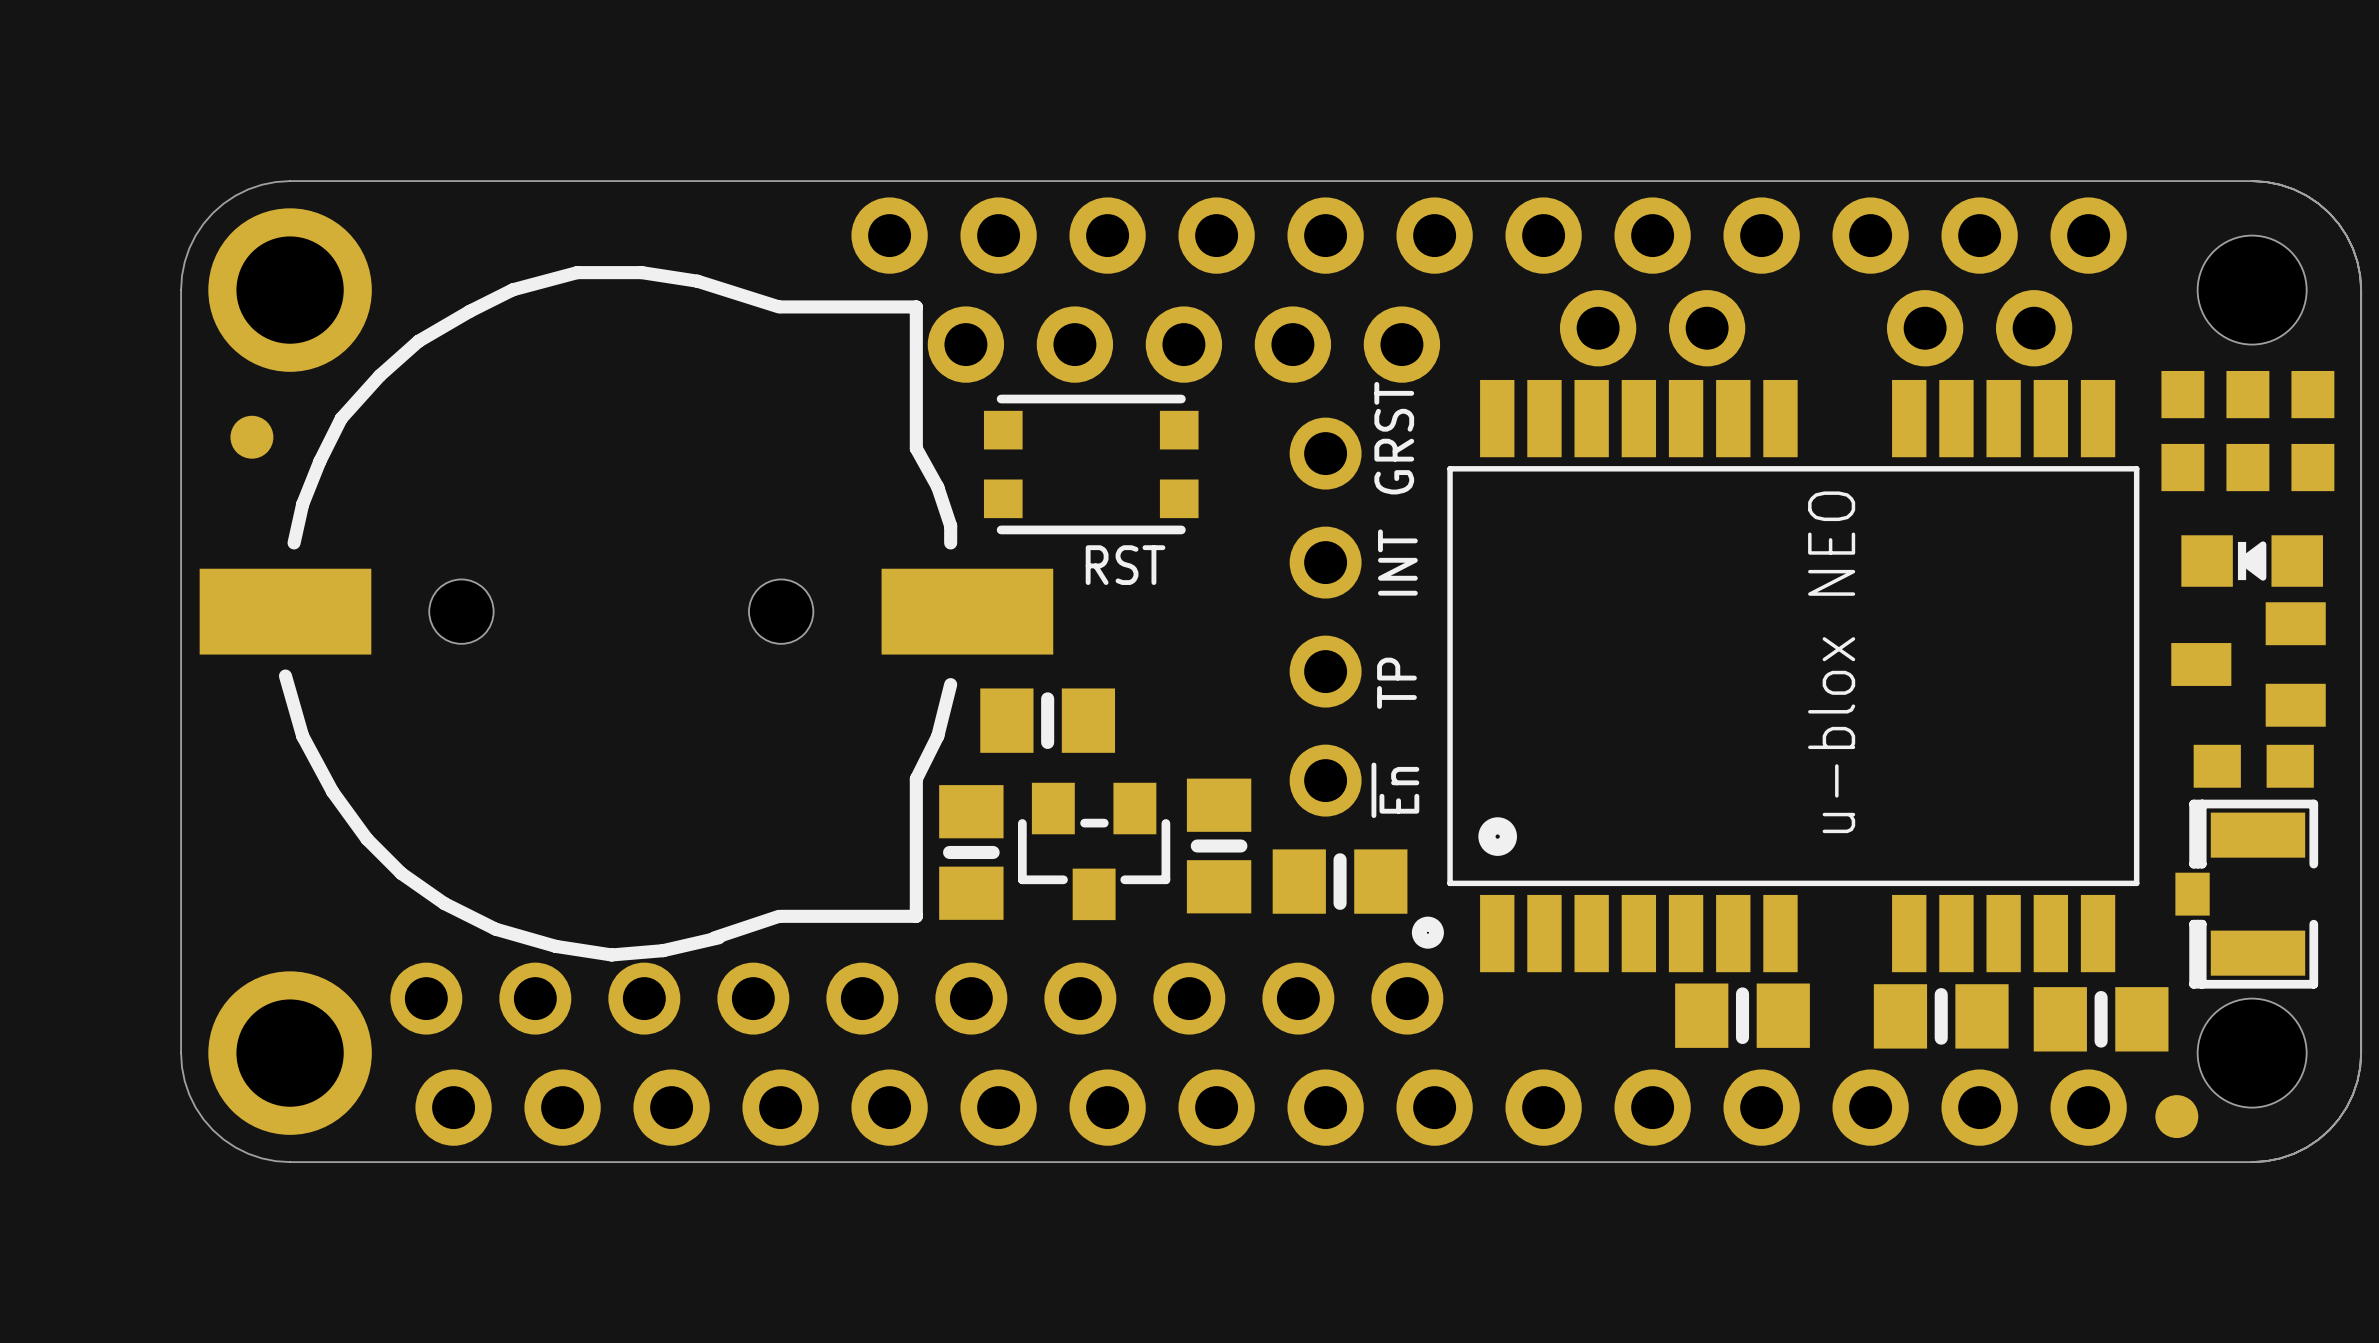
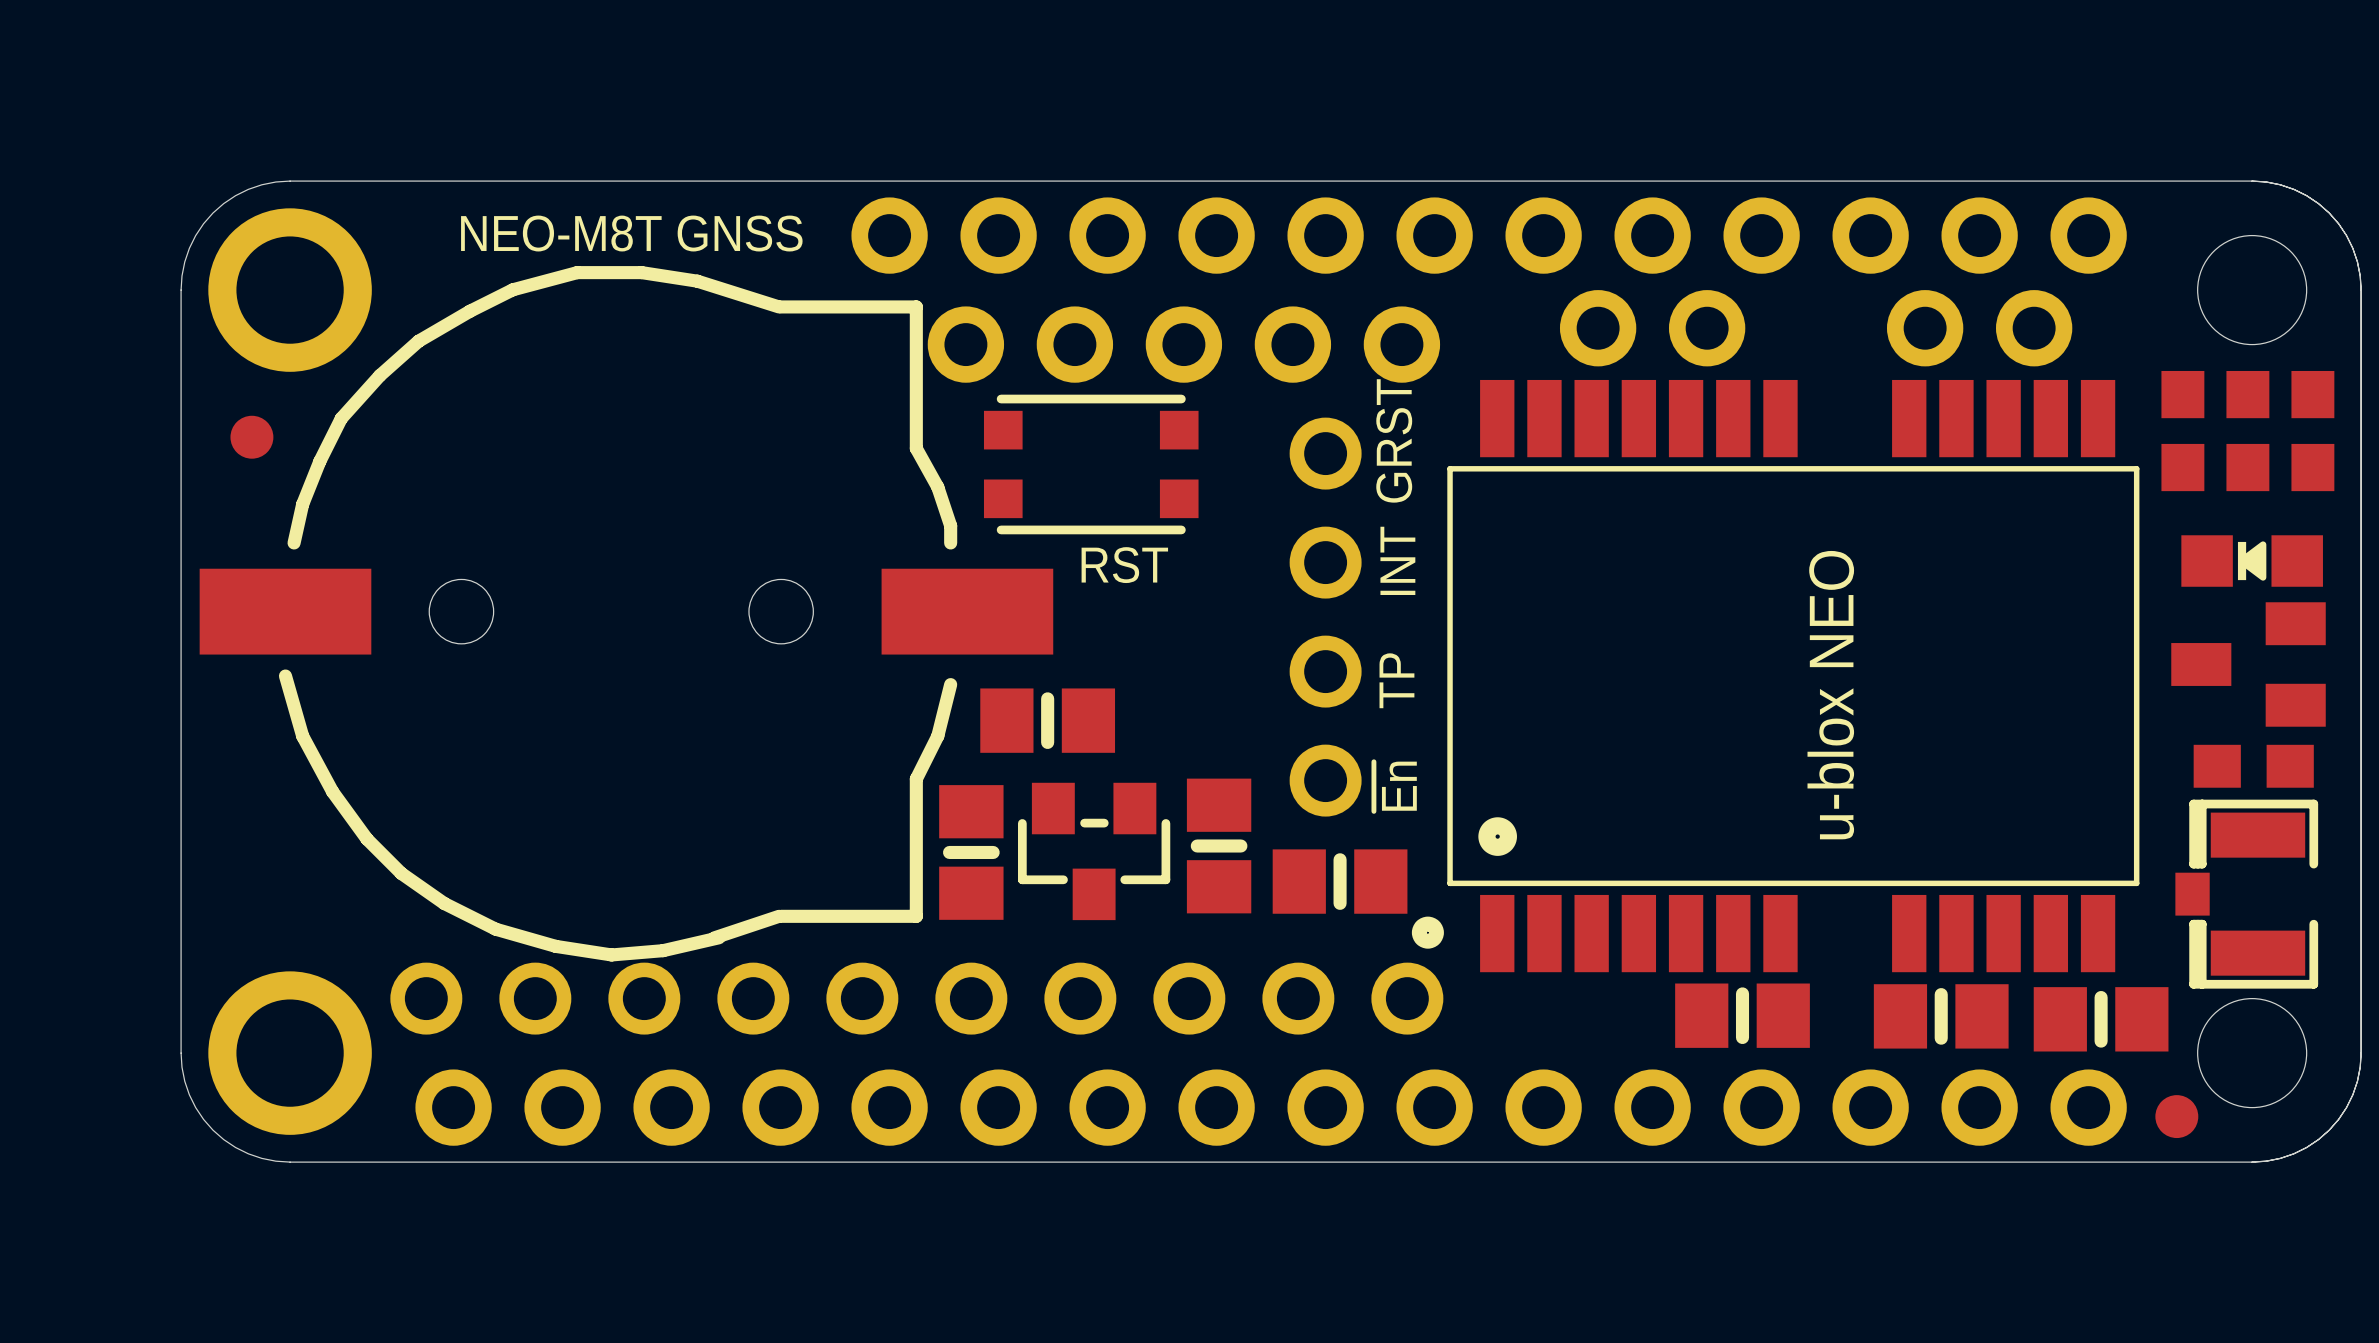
text: none -> NEO-M8T GNSS (631, 233)

